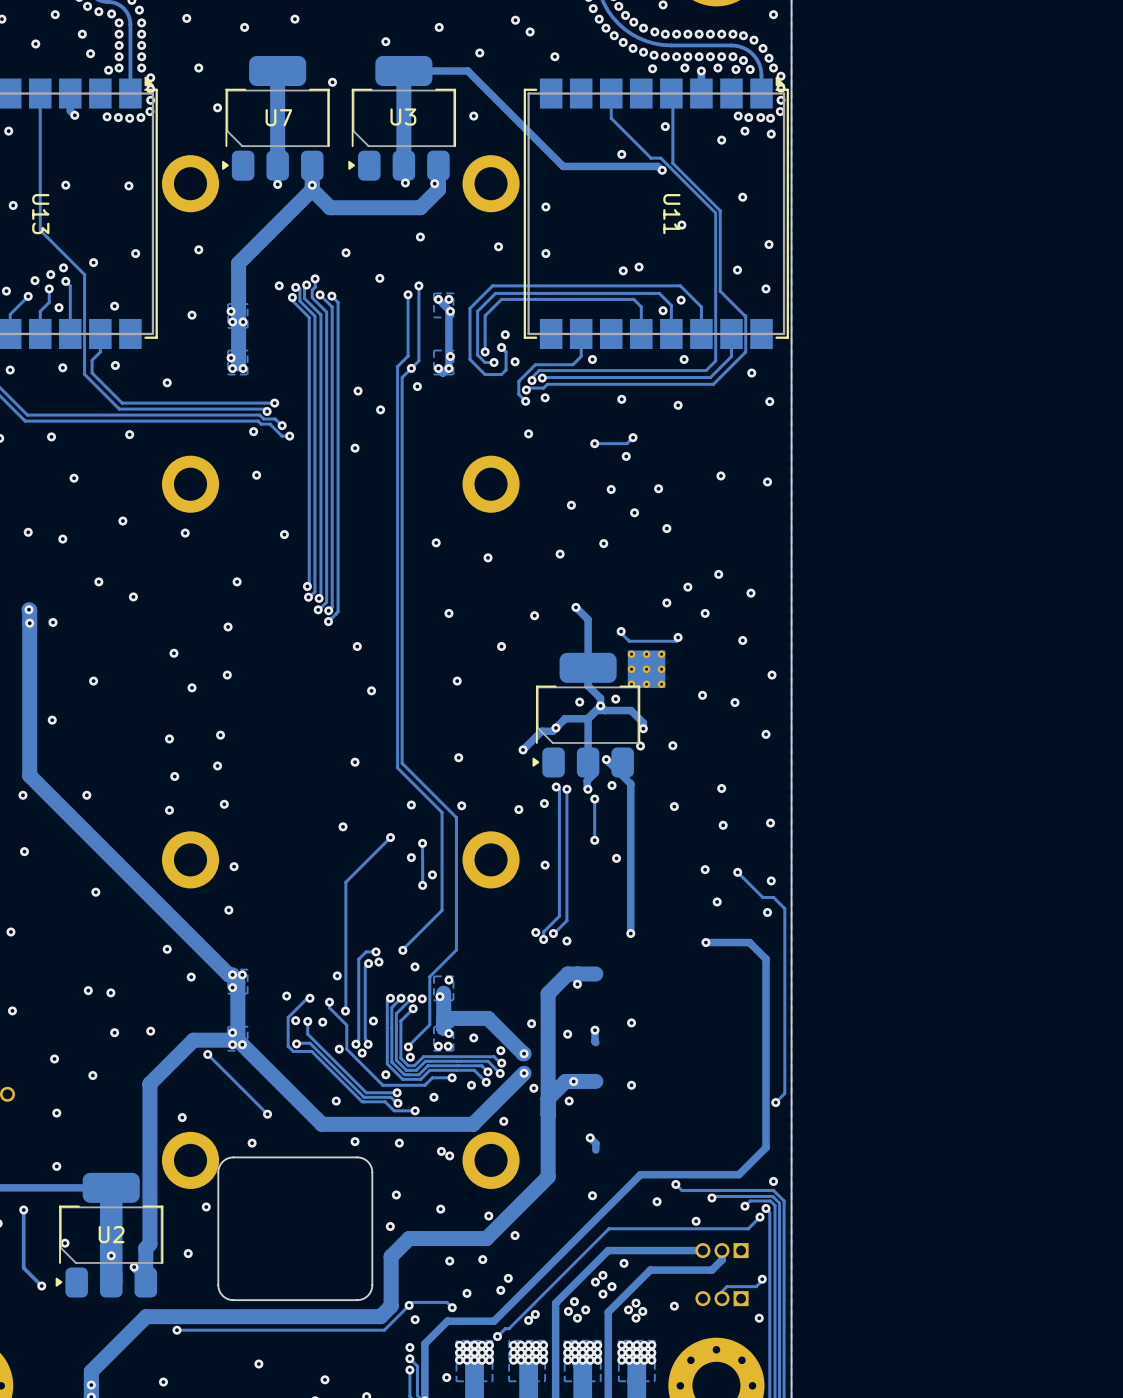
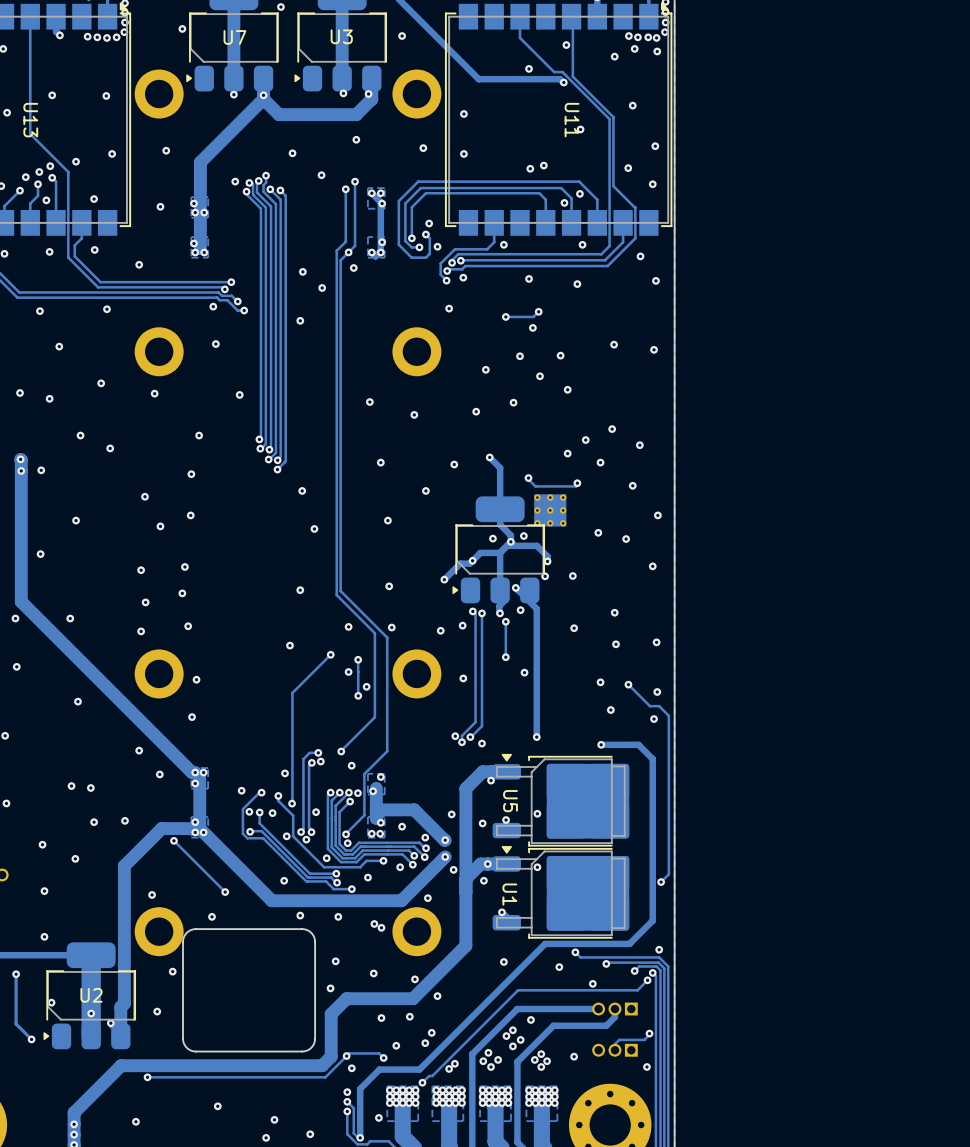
U5: none -> (560, 800)
U1: none -> (560, 892)

